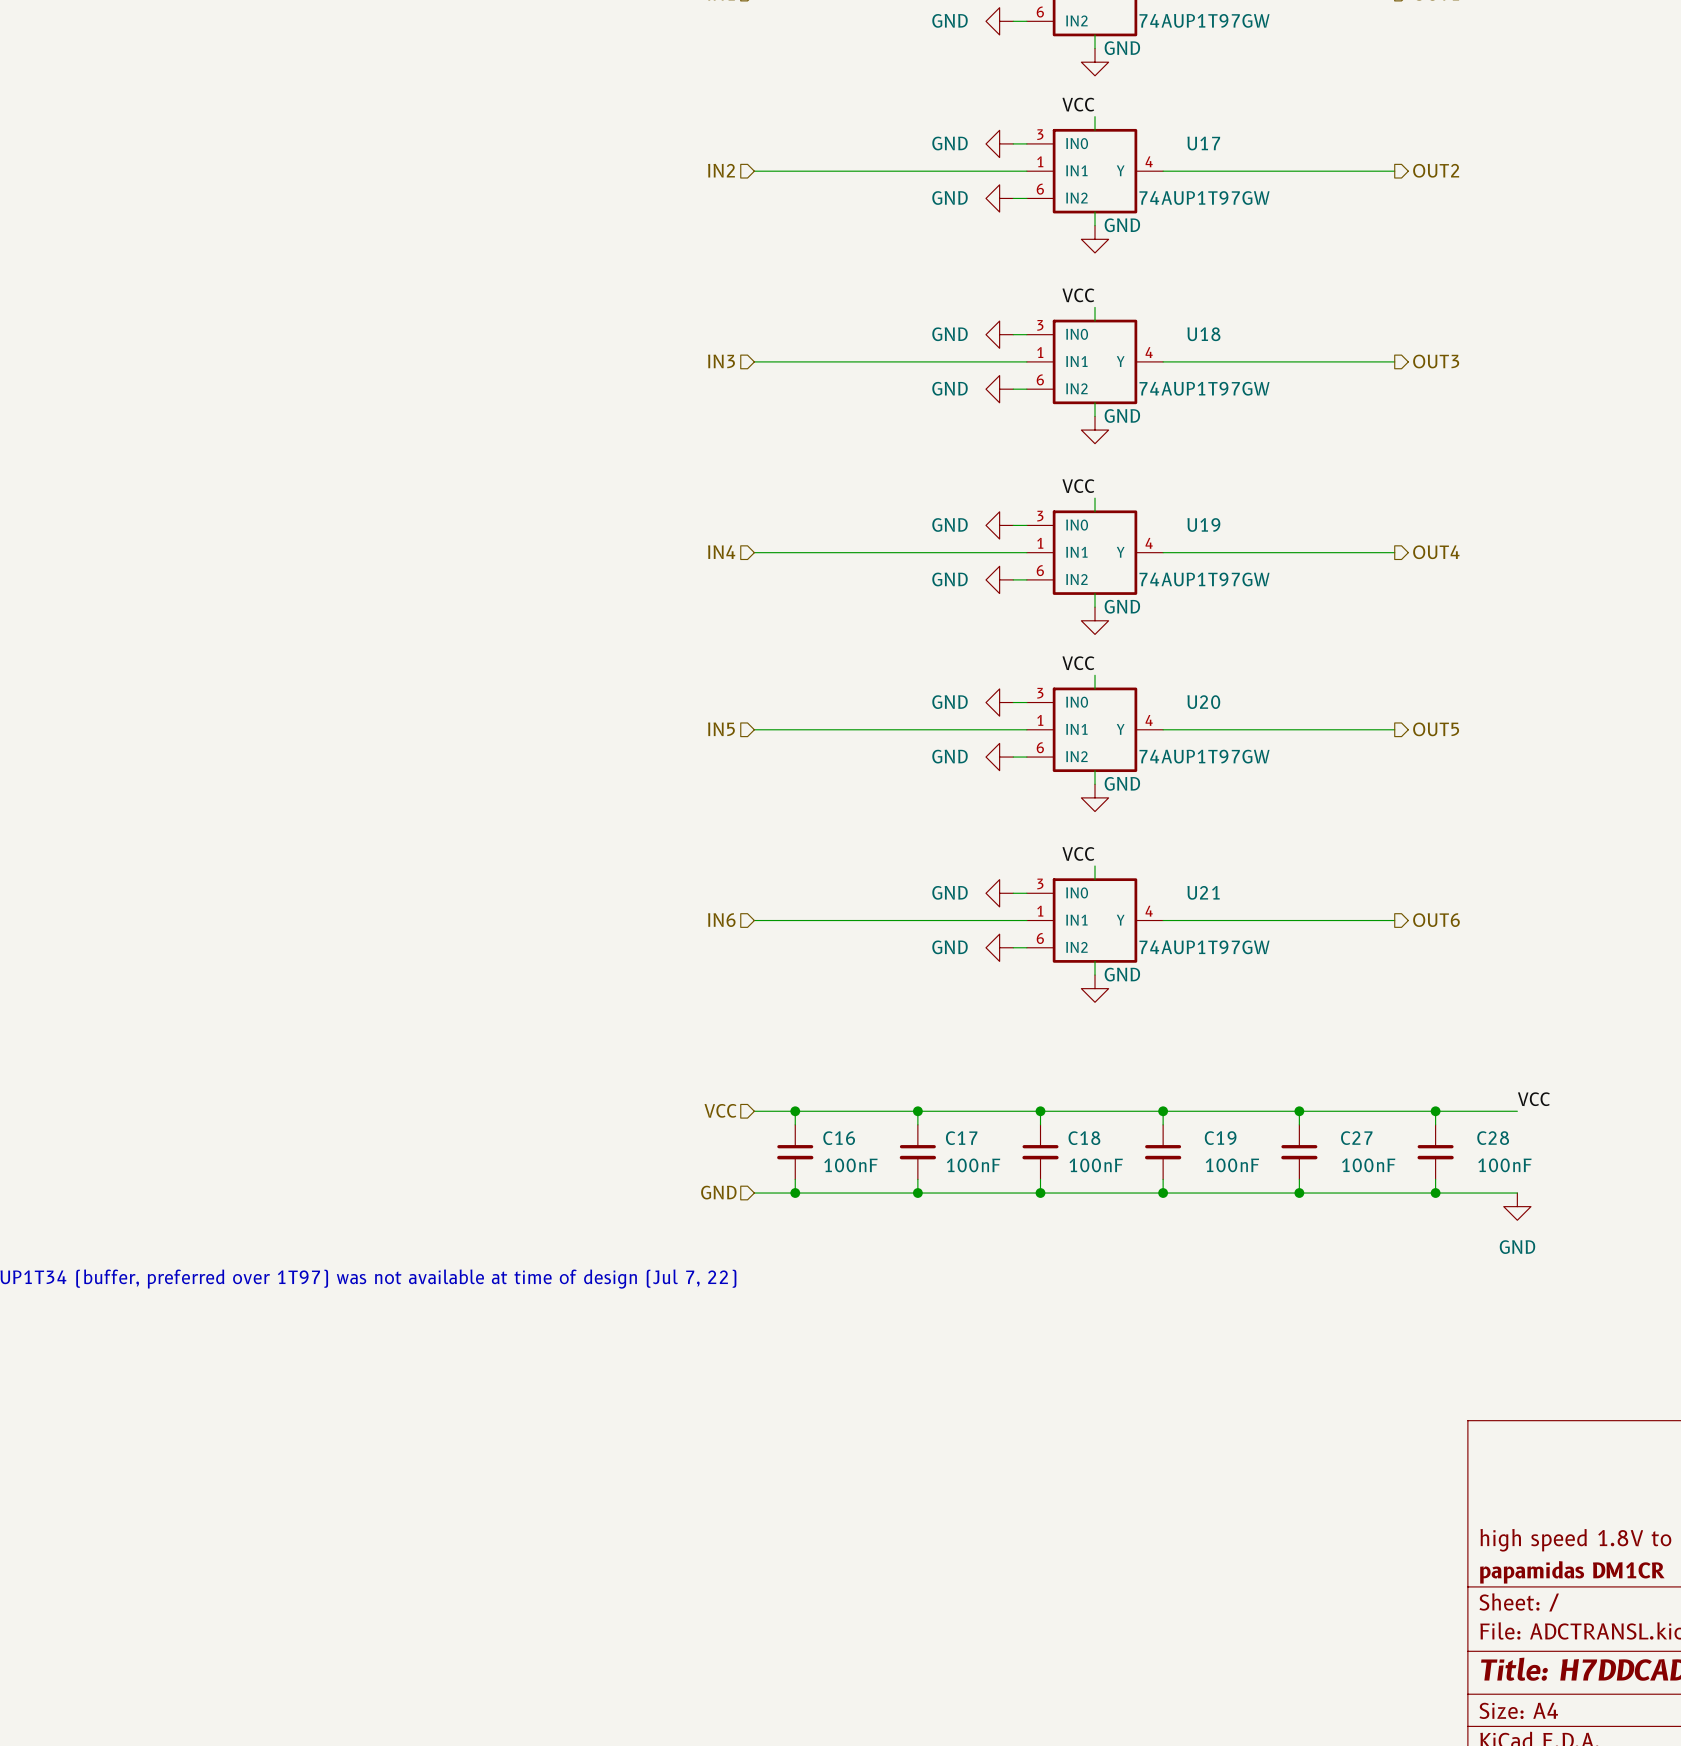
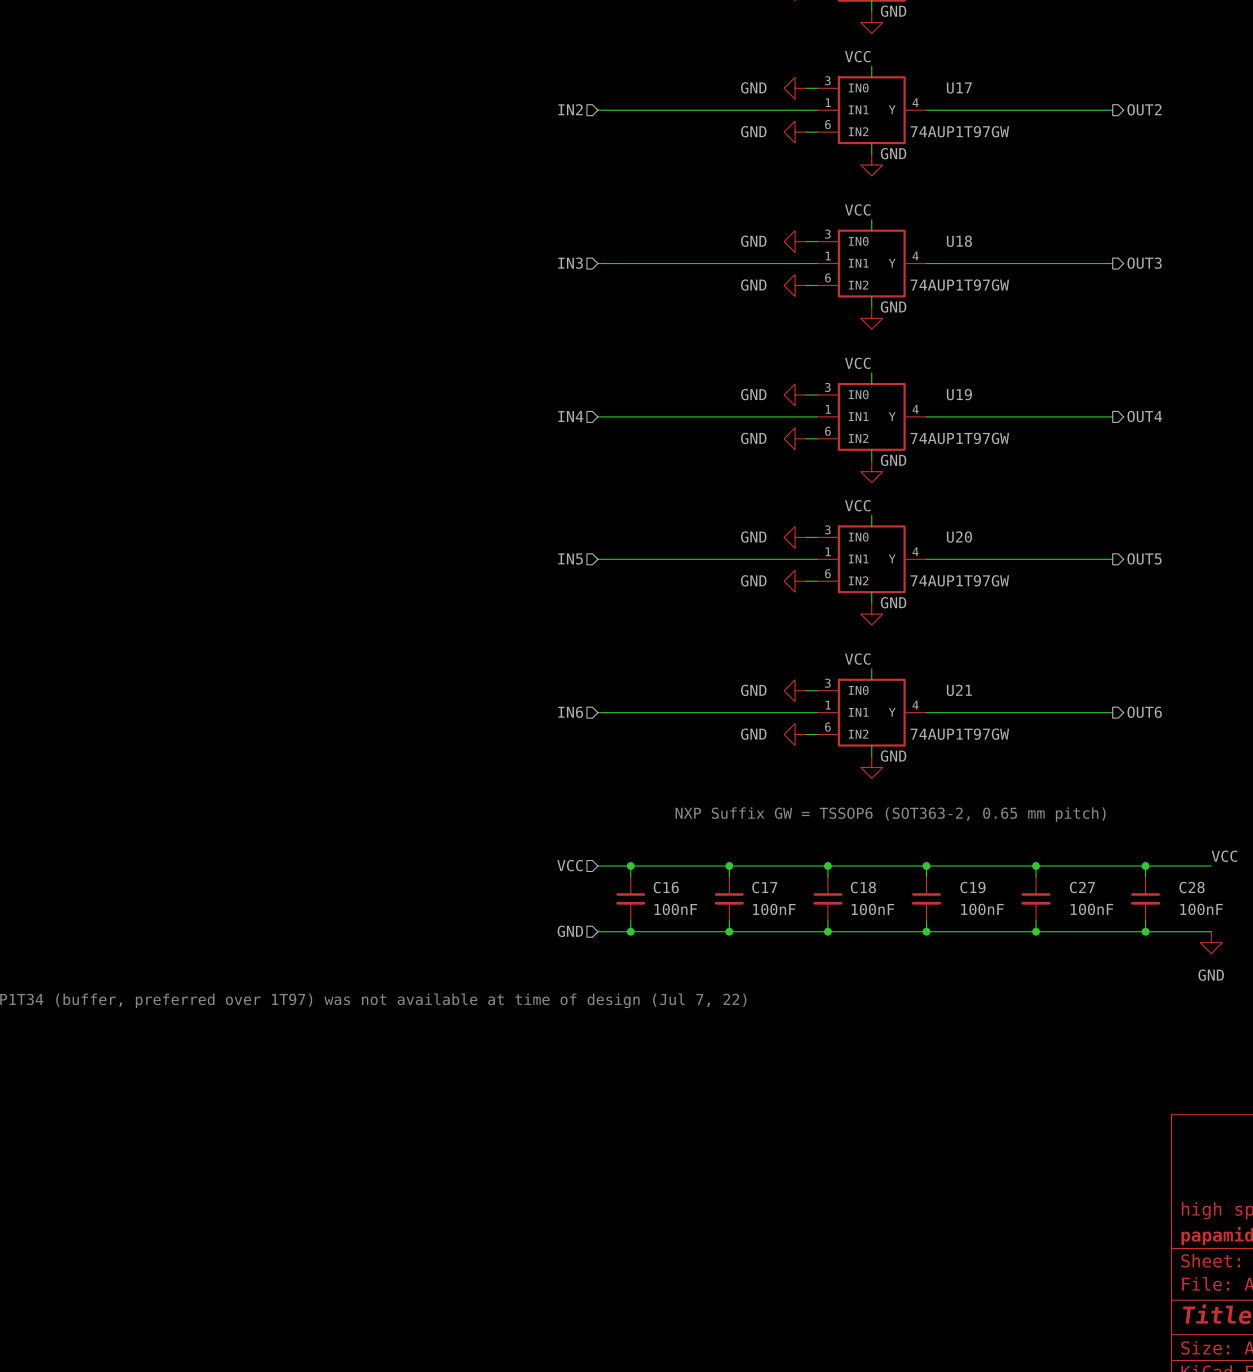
text: none -> NXP Suffix GW = TSSOP6 (SOT363-2, 0.65 mm pitch) (890, 814)

